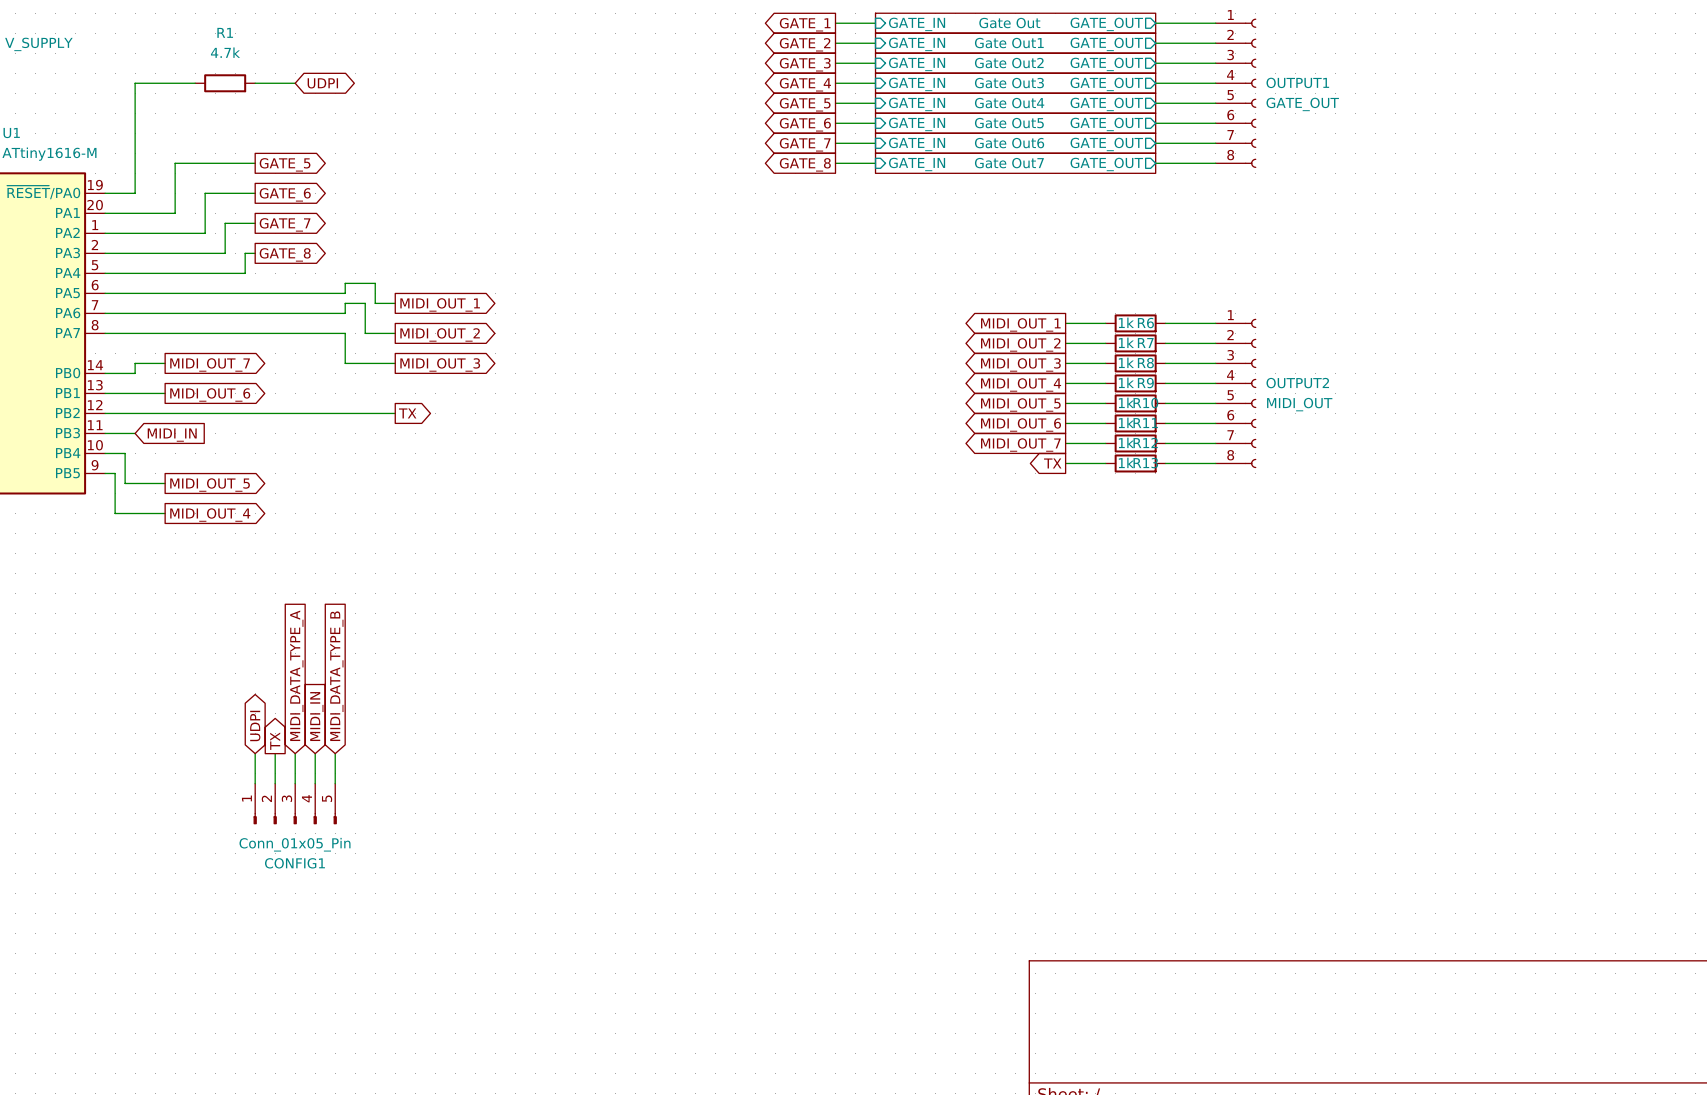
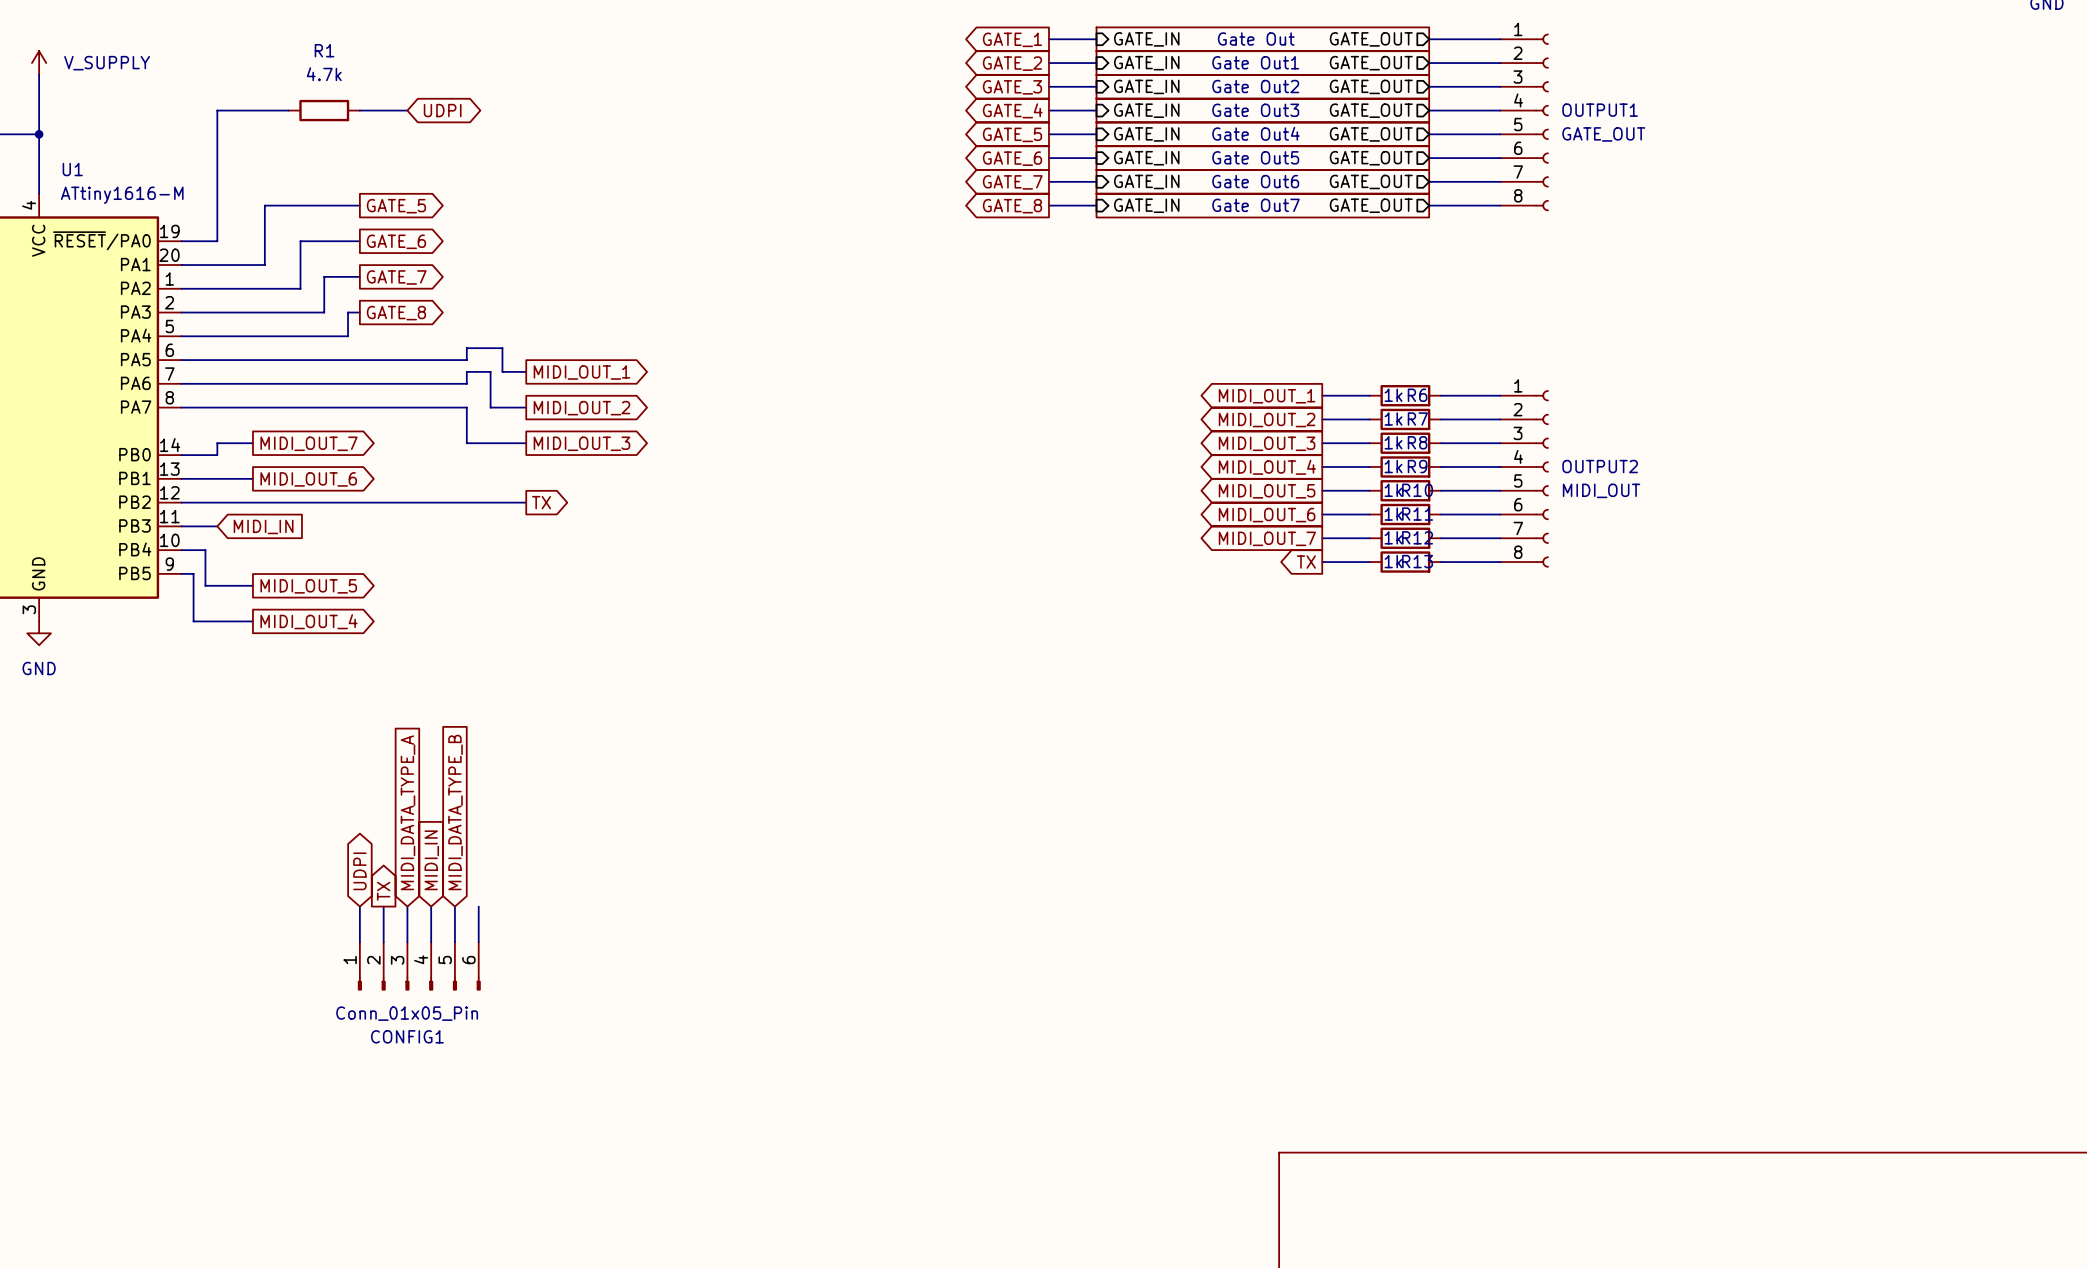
wire: none -> (478, 906) (478, 942)
CONFIG1 symbol: [253, 783, 337, 825] -> [358, 942, 481, 991]

